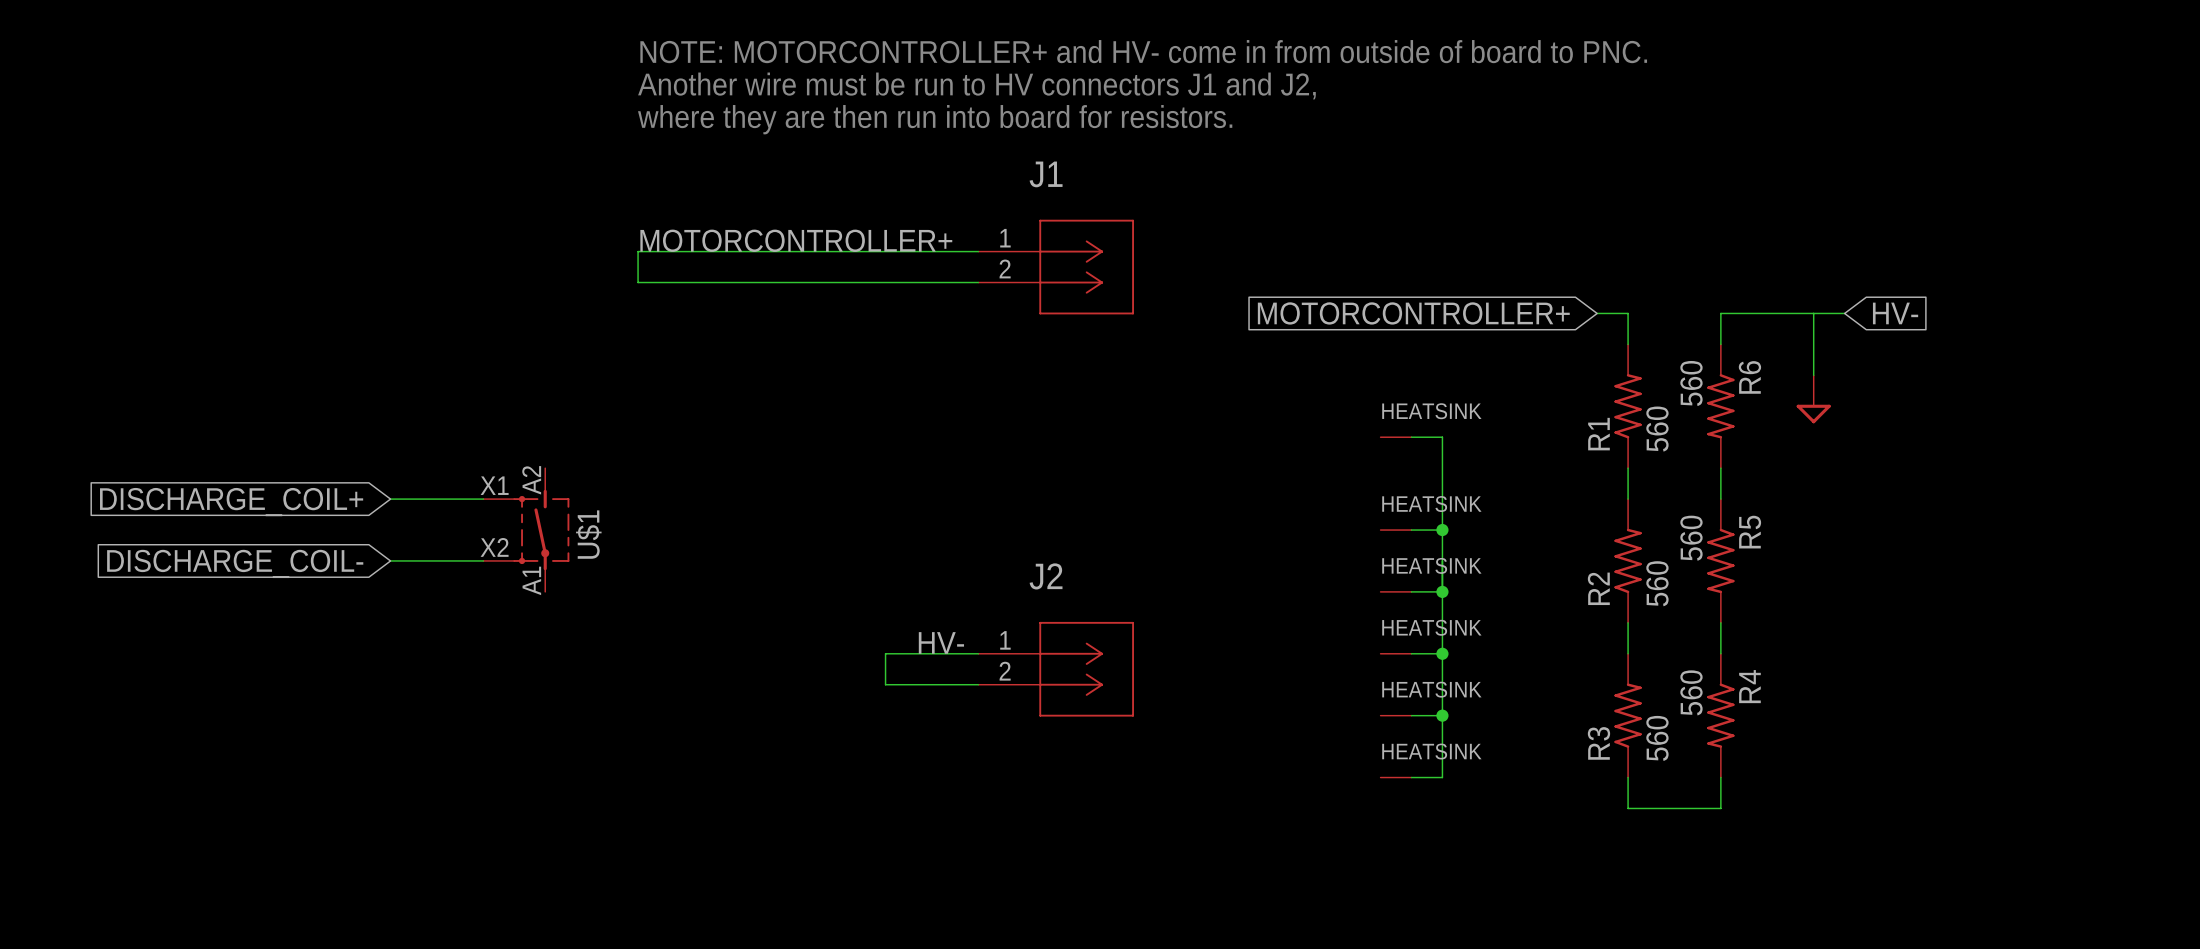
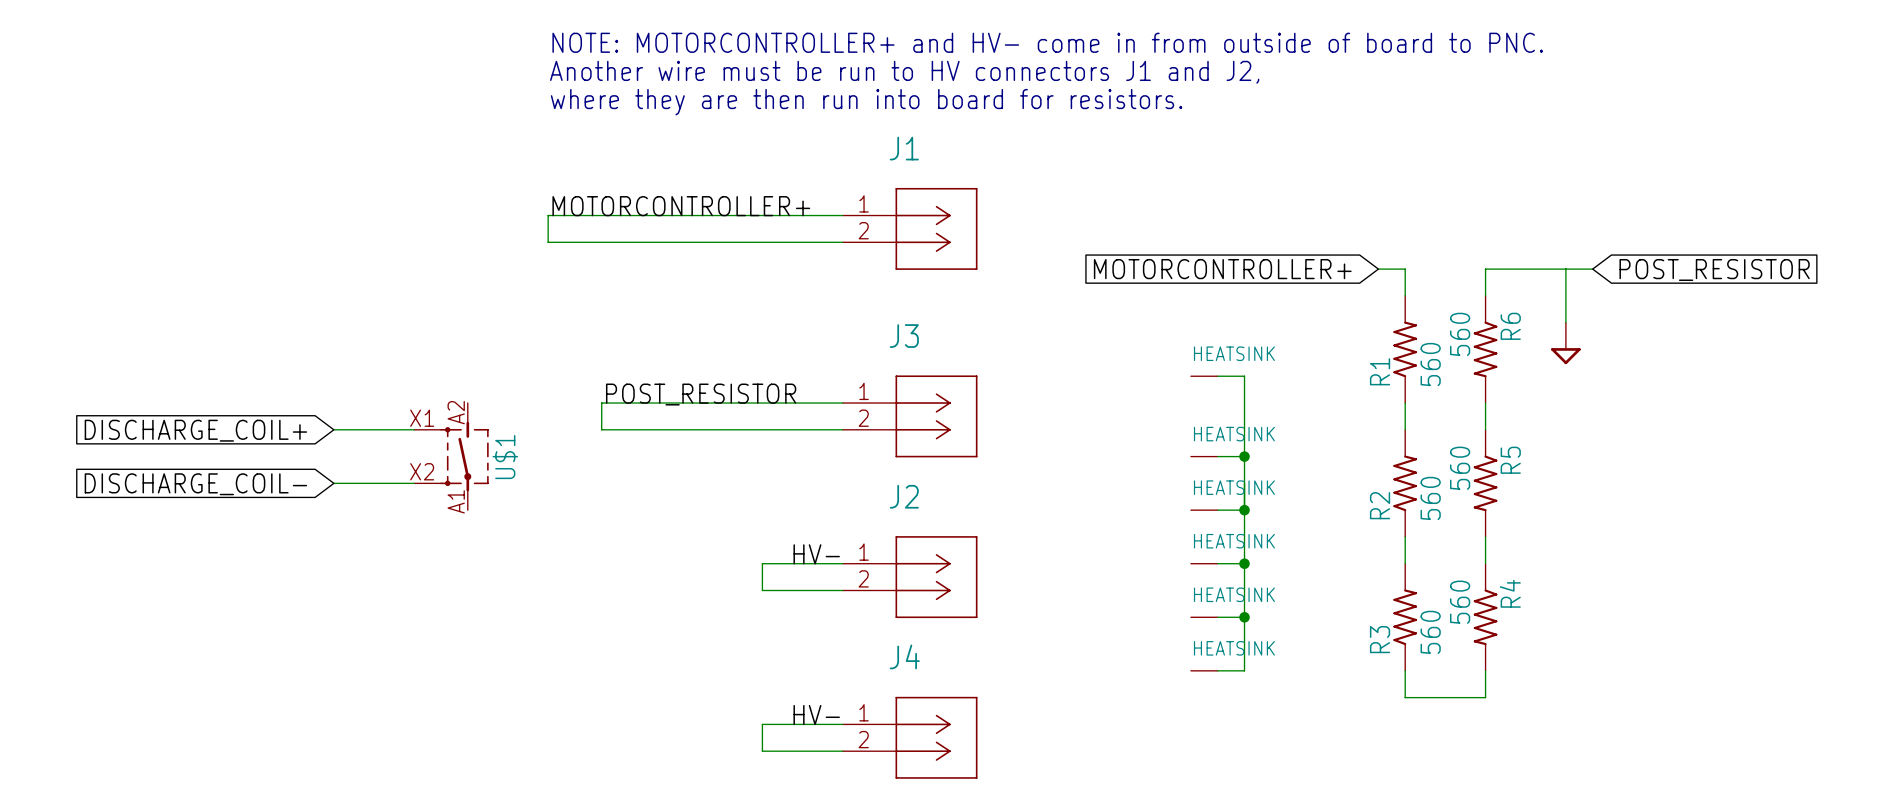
global label: HV- (1895, 313) -> POST_RESISTOR (1714, 269)
label: none -> POST_RESISTOR (701, 394)
wire: none -> (842, 403) (601, 403) (601, 429) (842, 429)
J3: none -> (910, 416)
label: none -> HV- (816, 715)
wire: none -> (842, 724) (762, 724) (762, 751) (842, 751)
J4: none -> (910, 737)

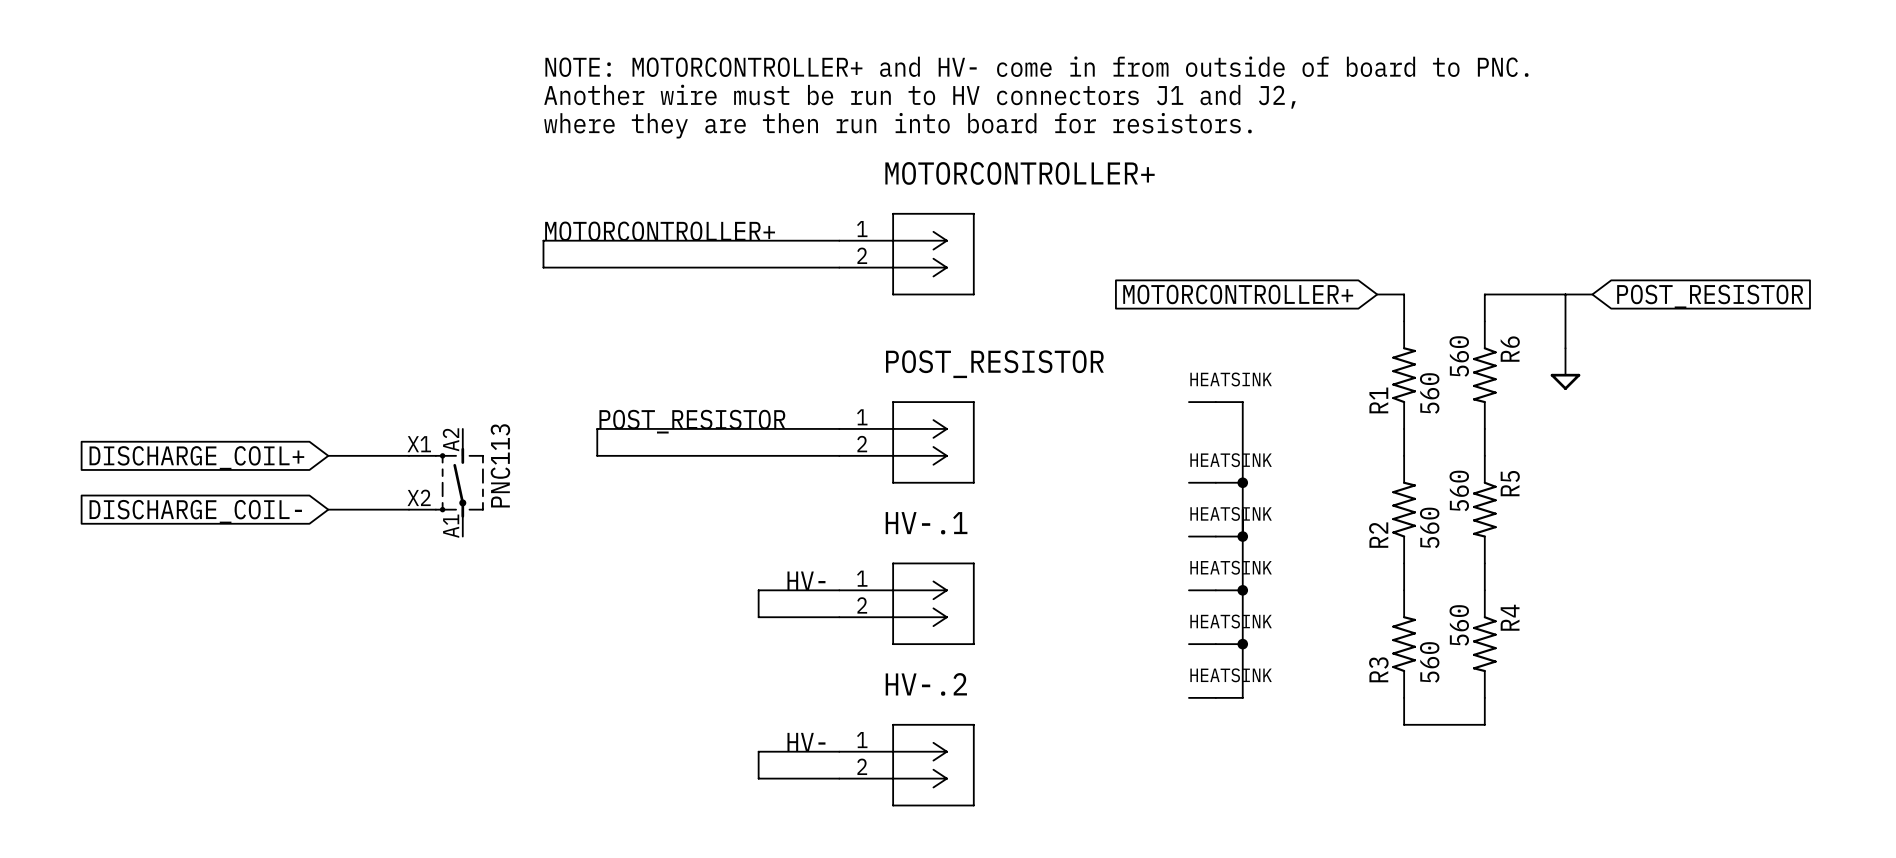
J1 name: J1 (904, 148) -> MOTORCONTROLLER+ (1020, 173)
J3 name: J3 (904, 336) -> POST_RESISTOR (994, 364)
U$1 name: U$1 (505, 457) -> PNC113 (500, 465)
J2 name: J2 (904, 496) -> HV-.1 (926, 523)
J4 name: J4 (904, 656) -> HV-.2 (926, 684)

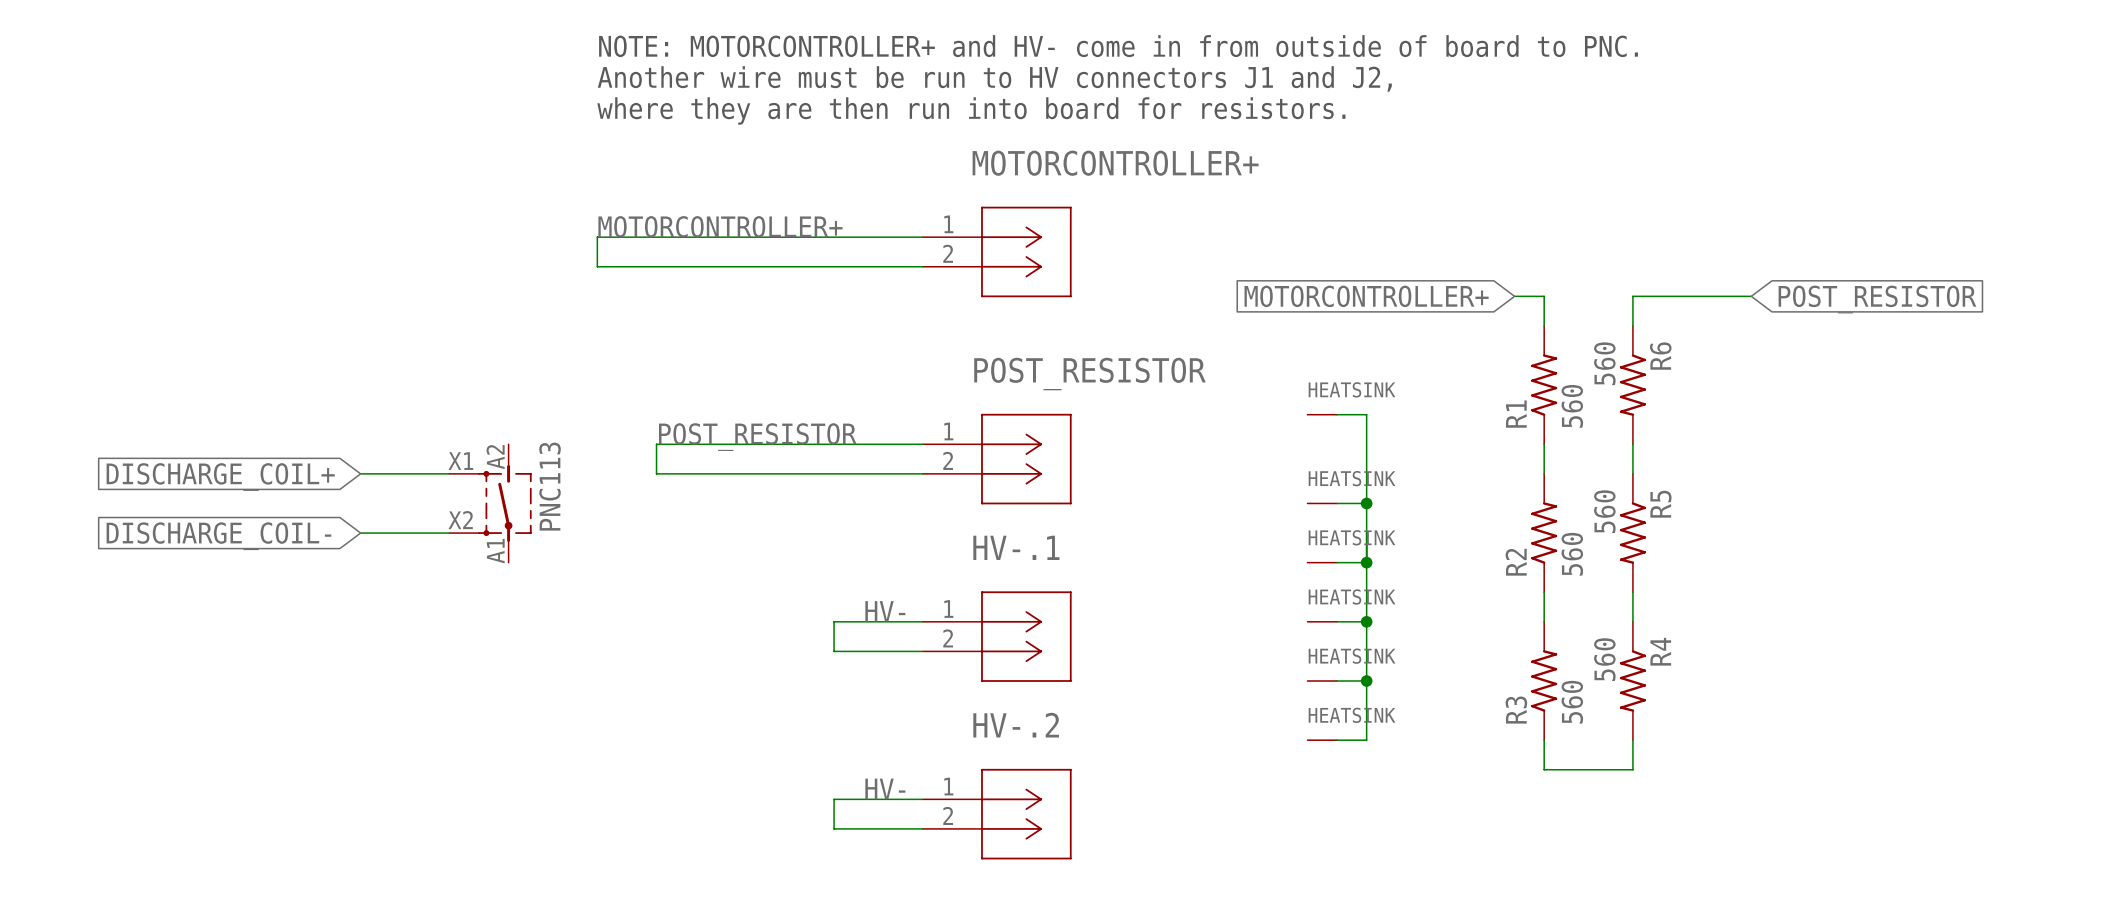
wire: (1565, 294) (1565, 348) -> none
power symbol: (1565, 369) -> none

